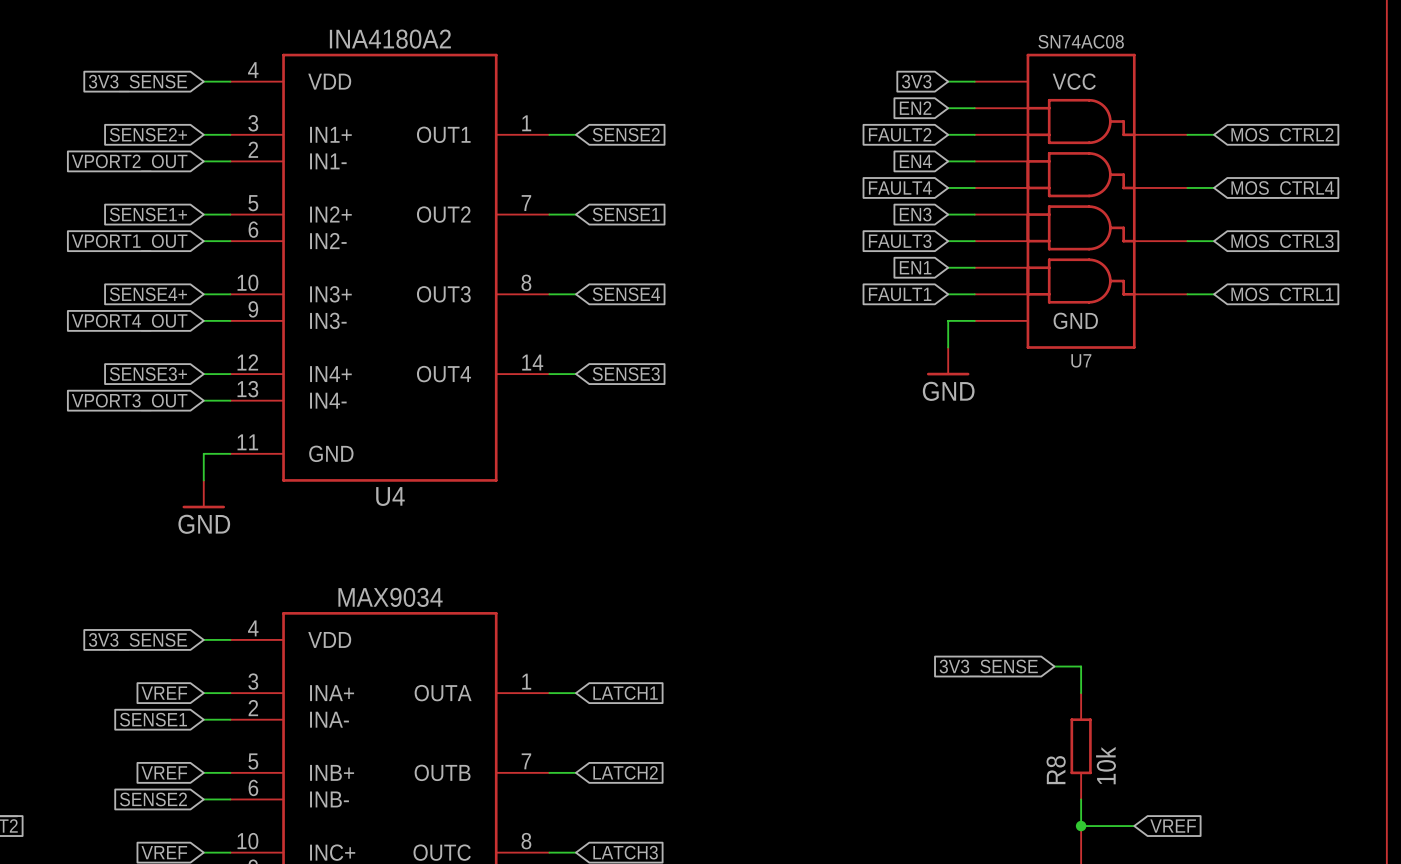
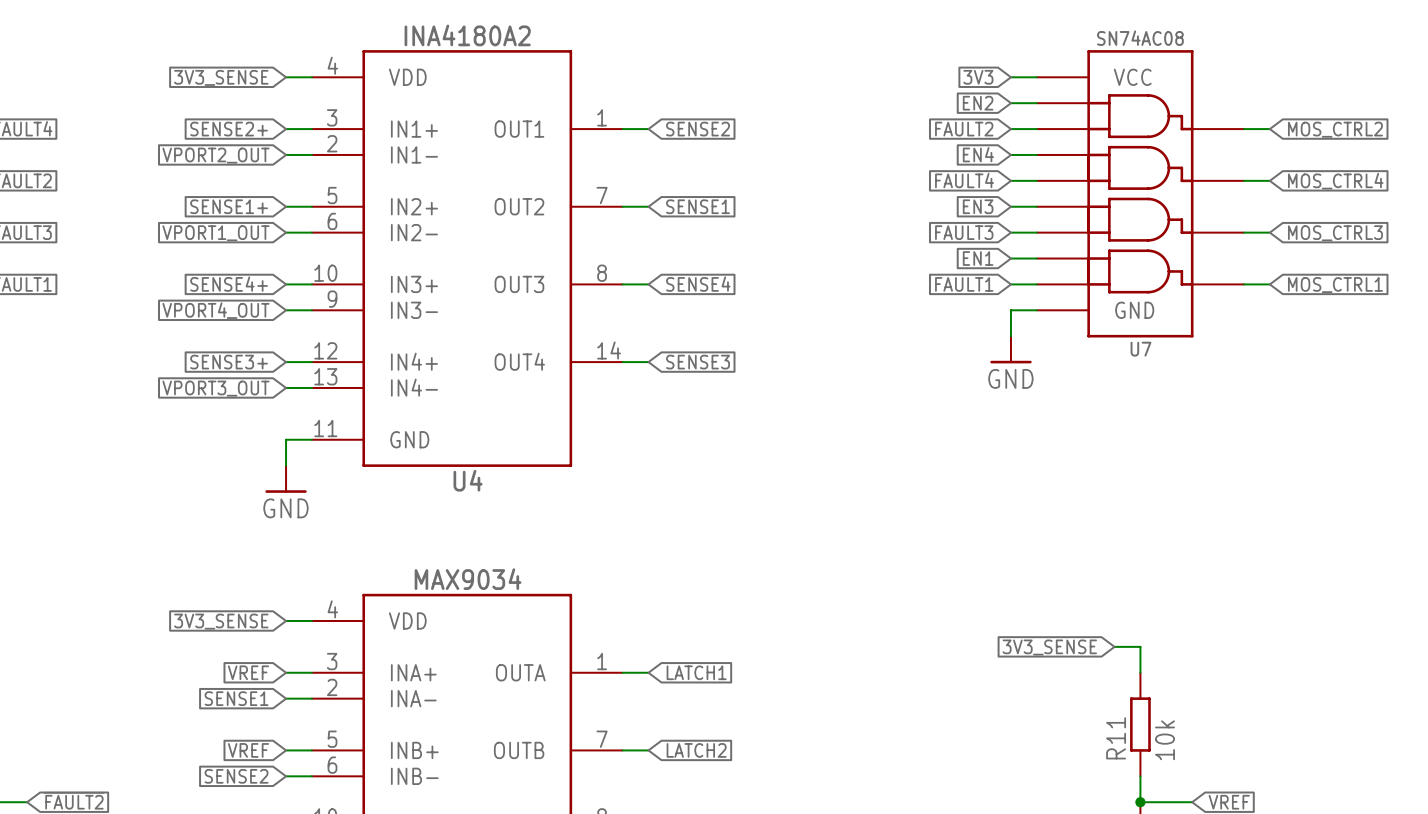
R8 name: R8 (1056, 770) -> R11 (1116, 738)

